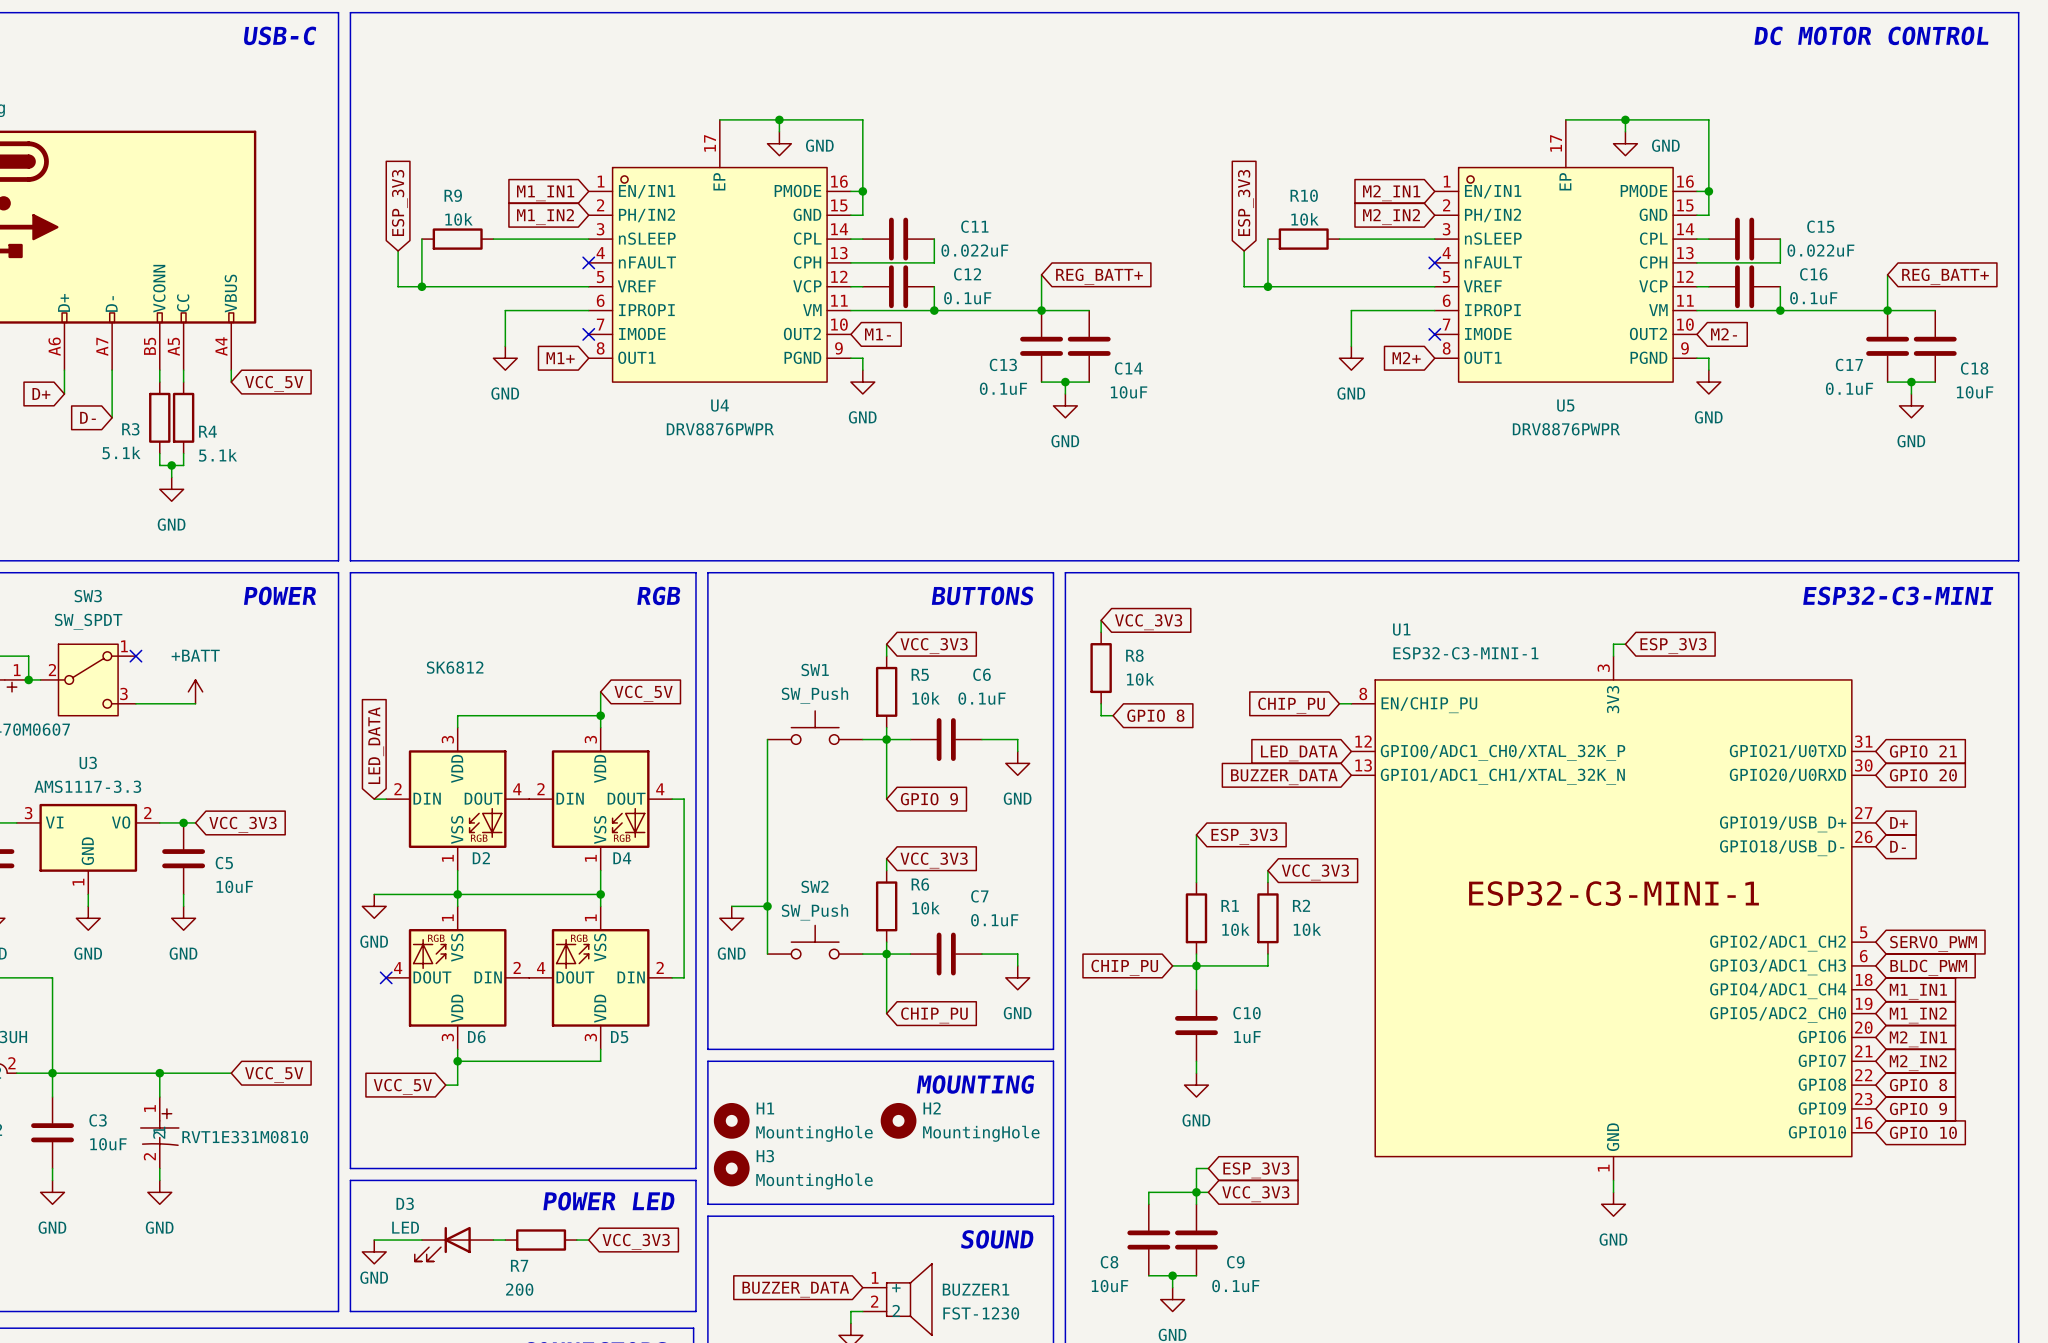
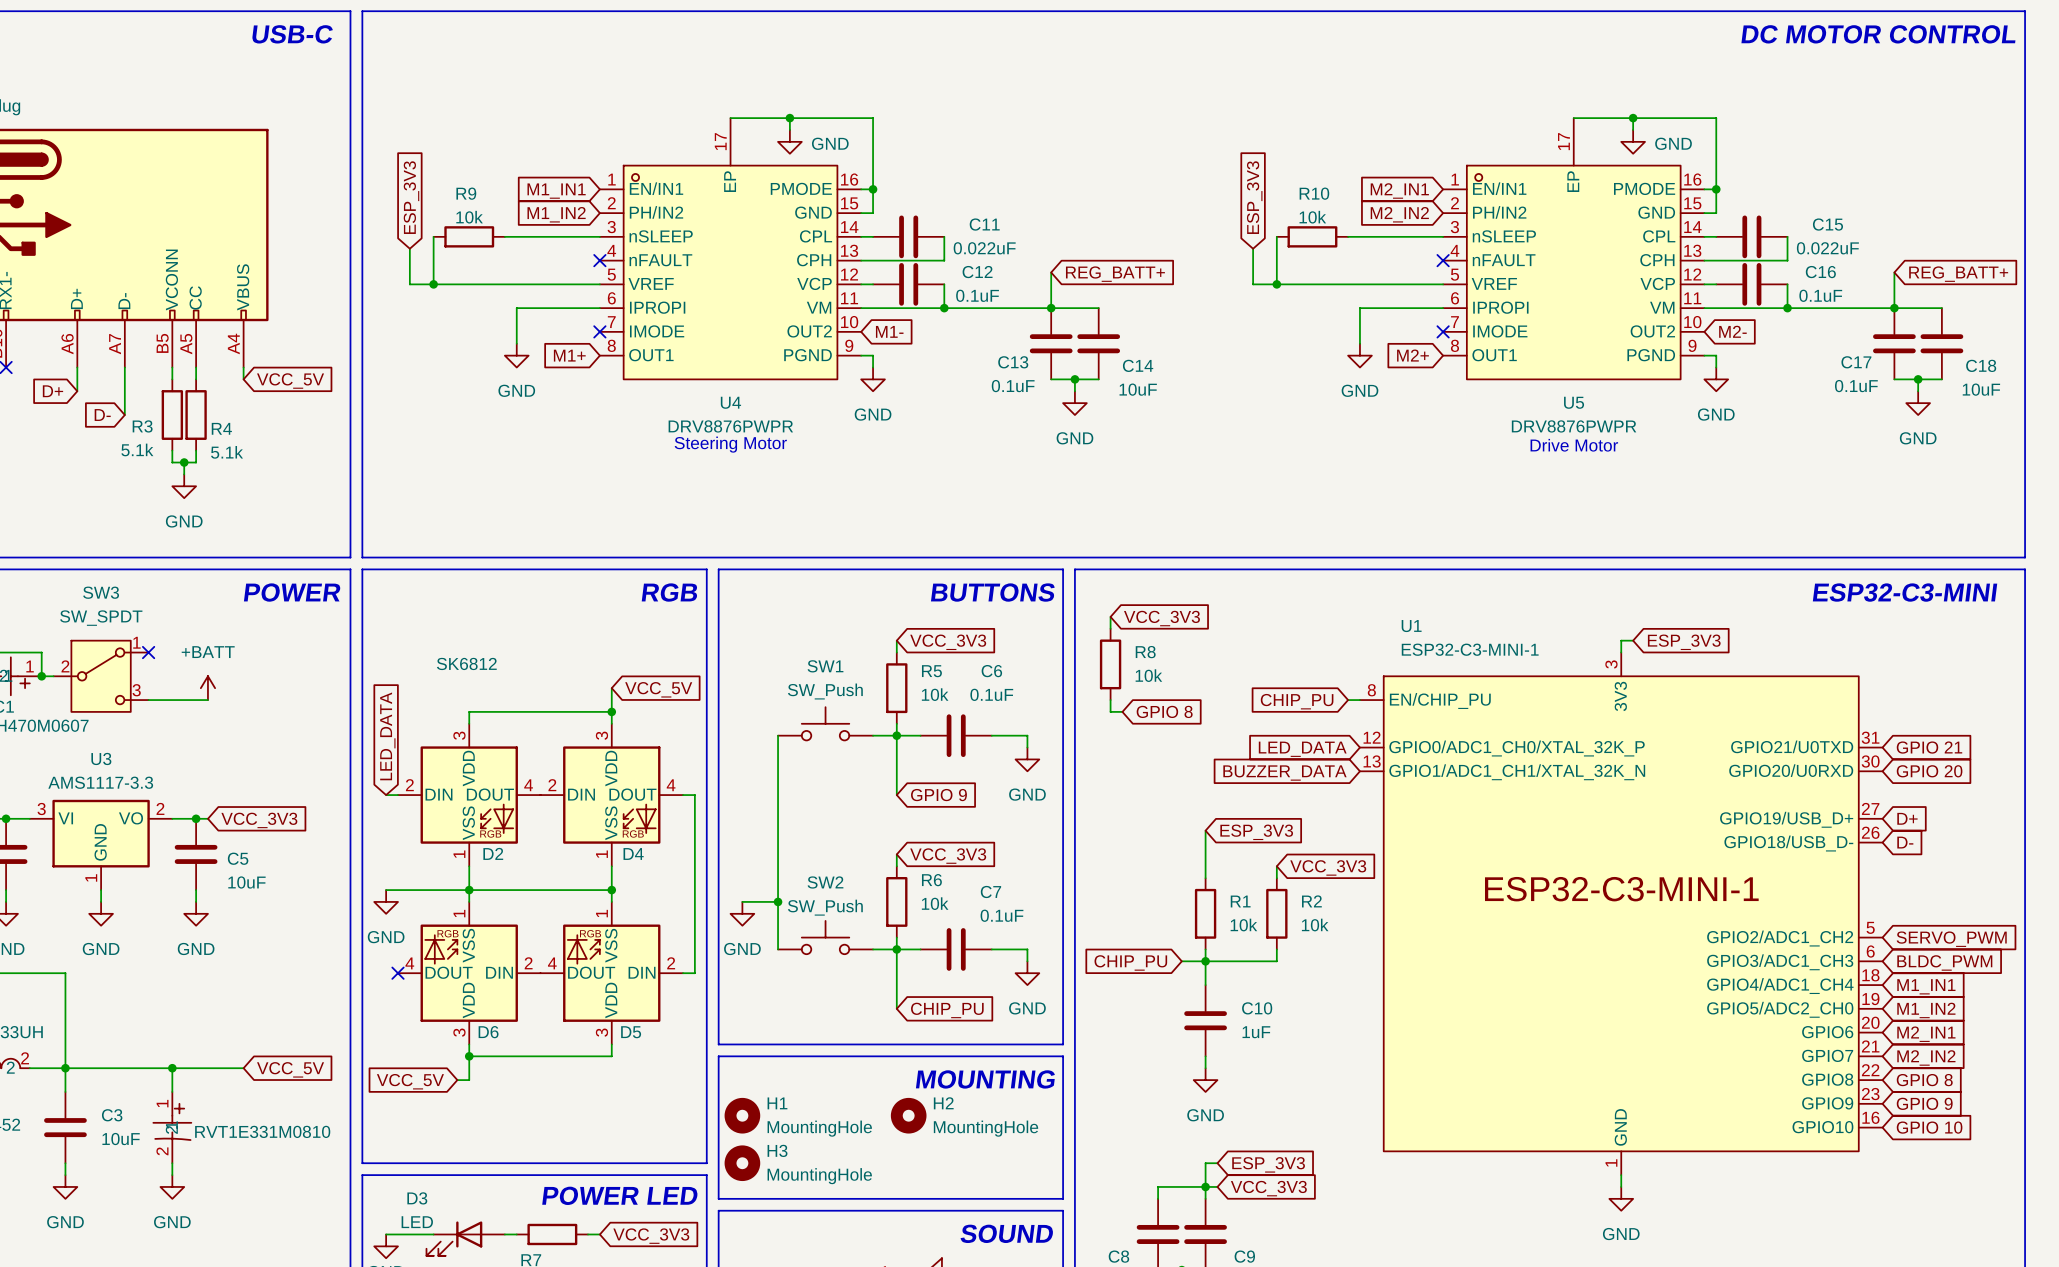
text: none -> Steering Motor (730, 444)
text: none -> Drive Motor (1574, 445)

